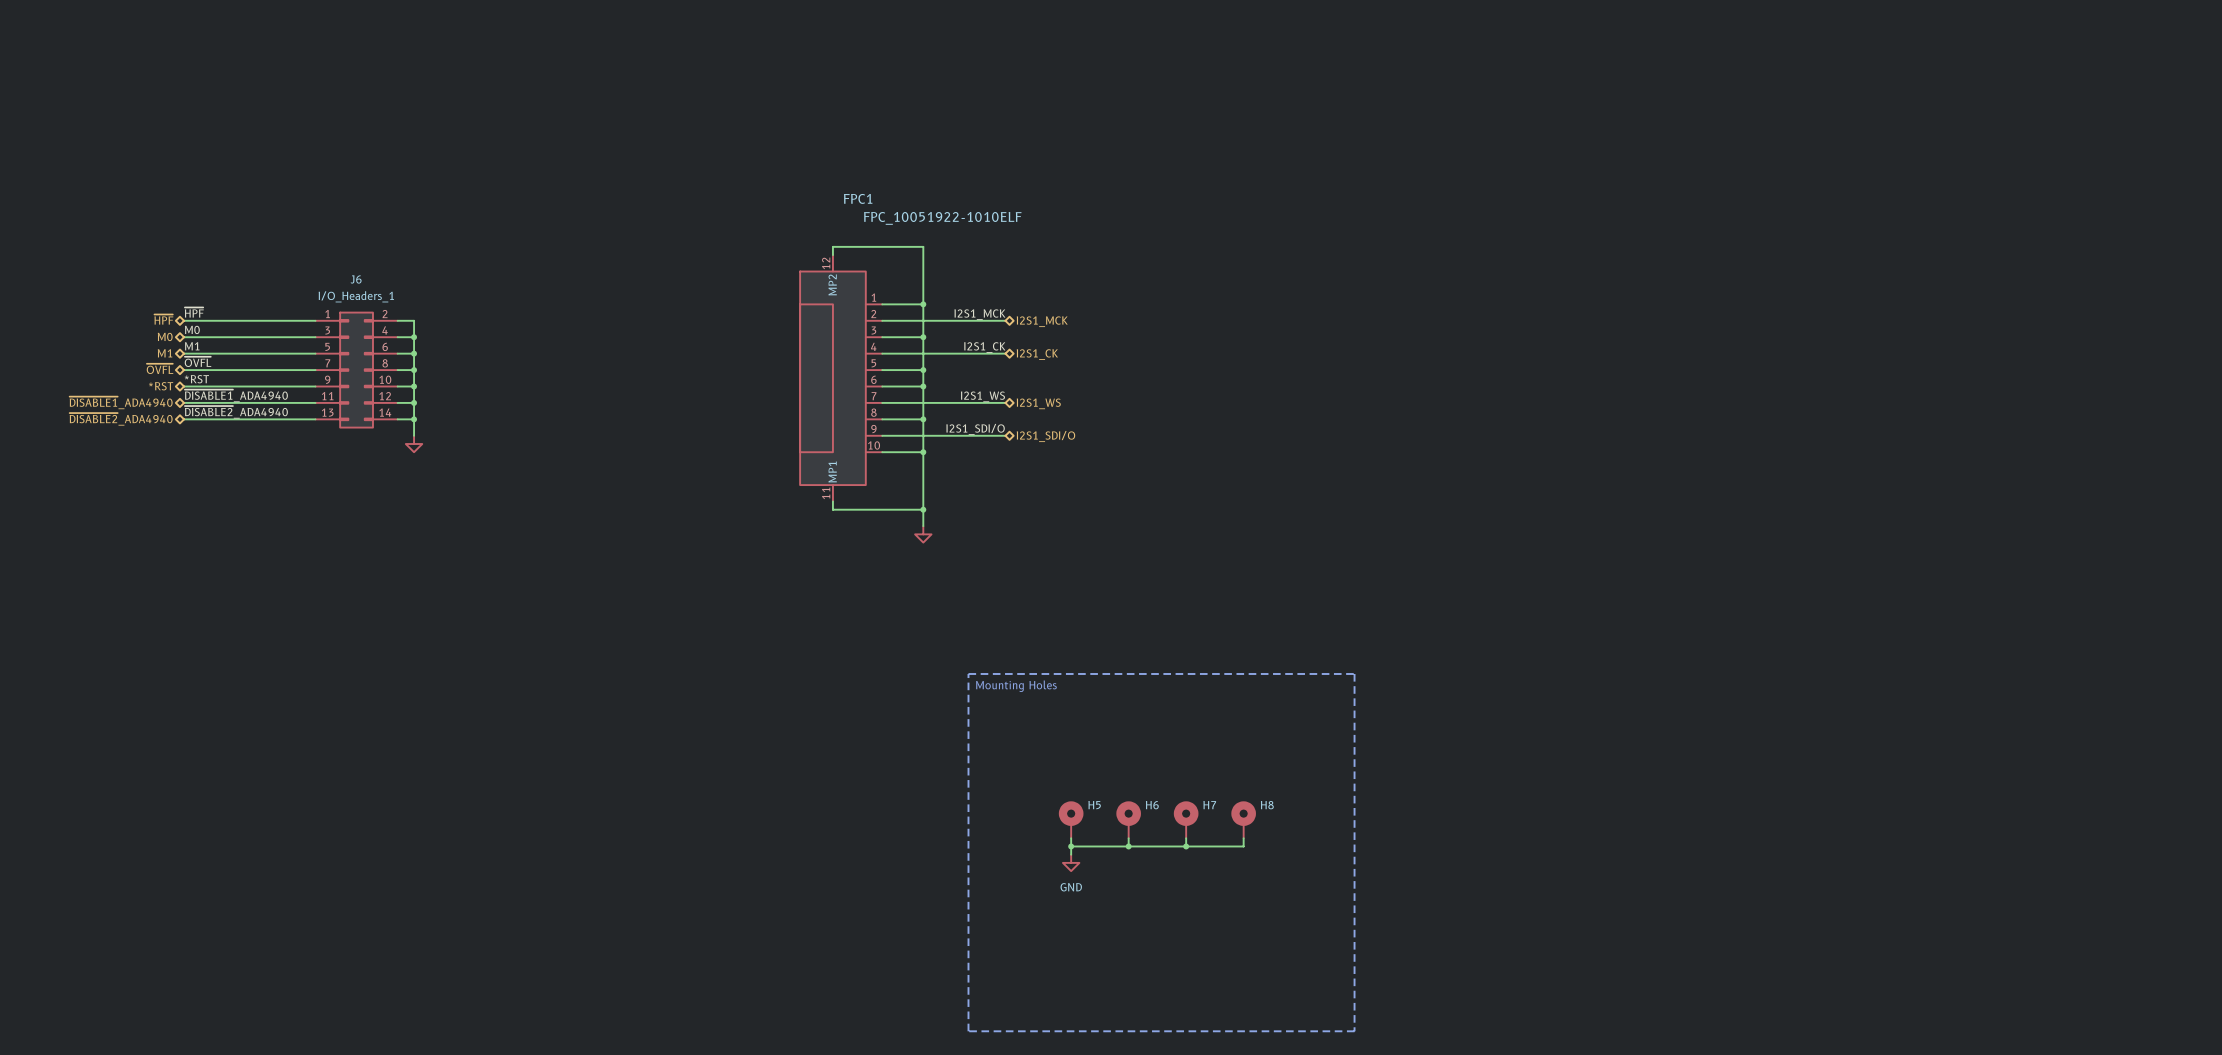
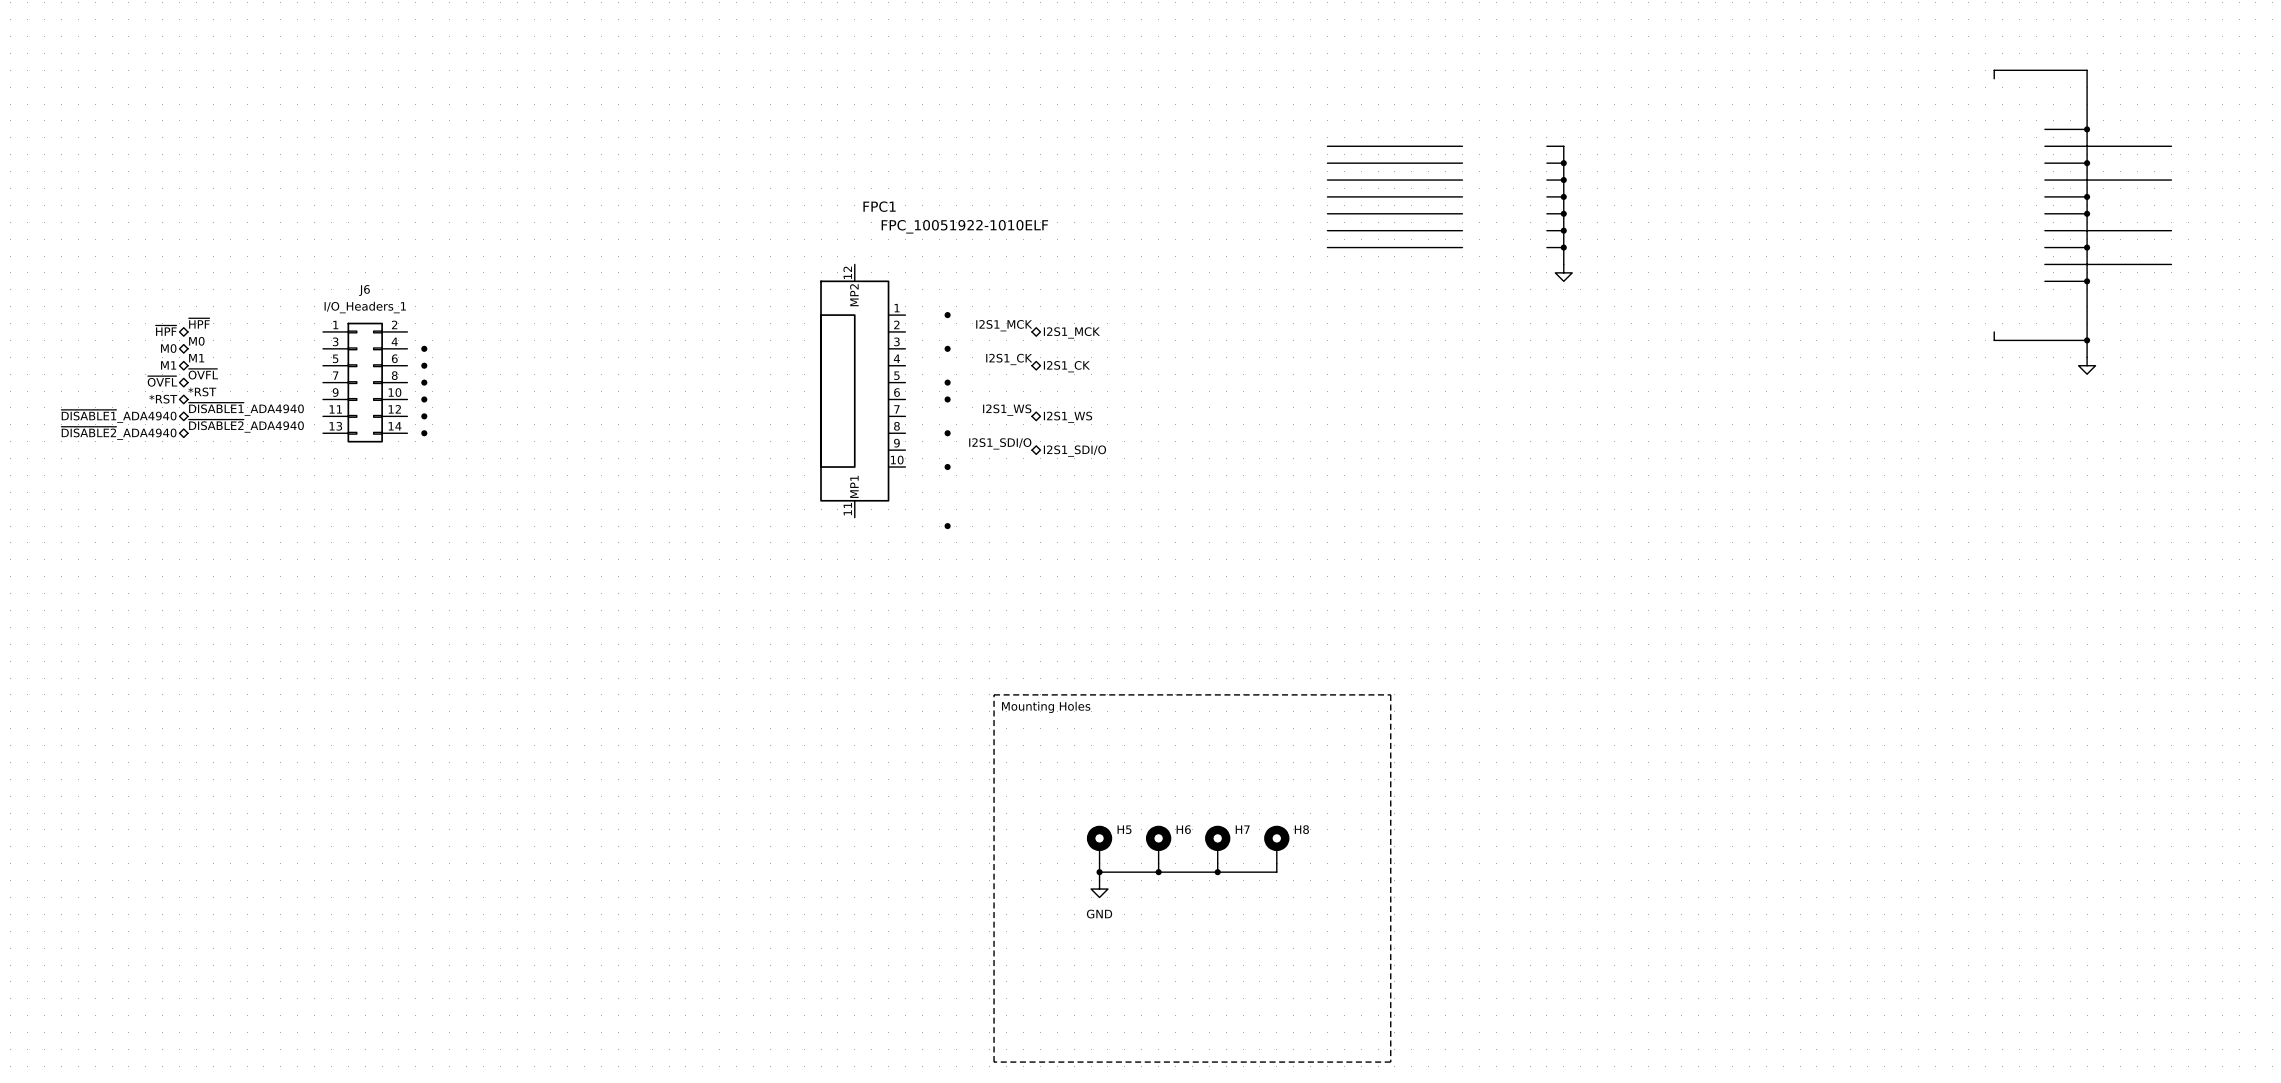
wire: none -> (1994, 78) (1994, 70) (2087, 70) (2087, 357)
wire: none -> (2044, 129) (2087, 129)
junction: none -> (2087, 129)
wire: none -> (1327, 146) (1462, 146)
wire: none -> (1546, 146) (1563, 146) (1563, 264)
wire: none -> (2044, 146) (2171, 146)
wire: none -> (1327, 163) (1462, 163)
wire: none -> (1546, 163) (1563, 163)
junction: none -> (1563, 163)
wire: none -> (2044, 163) (2087, 163)
junction: none -> (2087, 163)
wire: none -> (1327, 180) (1462, 180)
wire: none -> (1546, 180) (1563, 180)
junction: none -> (1563, 180)
wire: none -> (2044, 180) (2171, 180)
wire: none -> (1327, 196) (1462, 196)
wire: none -> (1546, 196) (1563, 196)
junction: none -> (1563, 196)
wire: none -> (2044, 196) (2087, 196)
junction: none -> (2087, 196)
wire: none -> (1327, 213) (1462, 213)
wire: none -> (1546, 213) (1563, 213)
junction: none -> (1563, 213)
wire: none -> (2044, 213) (2087, 213)
junction: none -> (2087, 213)
wire: none -> (1327, 230) (1462, 230)
wire: none -> (1546, 230) (1563, 230)
junction: none -> (1563, 230)
wire: none -> (2044, 230) (2171, 230)
wire: none -> (1327, 247) (1462, 247)
wire: none -> (1546, 247) (1563, 247)
junction: none -> (1563, 247)
wire: none -> (2044, 247) (2087, 247)
junction: none -> (2087, 247)
wire: (832, 255) (832, 246) (923, 246) (923, 526) -> none
wire: none -> (2044, 264) (2171, 264)
power symbol: none -> (1563, 272)
wire: none -> (2044, 281) (2087, 281)
junction: none -> (2087, 281)
wire: (882, 304) (923, 304) -> none
wire: (184, 320) (315, 320) -> none
wire: (397, 320) (414, 320) (414, 435) -> none
wire: (882, 320) (1005, 320) -> none
wire: none -> (1994, 331) (1994, 340) (2087, 340)
junction: none -> (2087, 340)
wire: (184, 337) (315, 337) -> none
wire: (397, 337) (414, 337) -> none
wire: (882, 337) (923, 337) -> none
wire: (184, 353) (315, 353) -> none
wire: (397, 353) (414, 353) -> none
wire: (882, 353) (1005, 353) -> none
power symbol: none -> (2087, 365)
wire: (184, 370) (315, 370) -> none
wire: (397, 370) (414, 370) -> none
wire: (882, 370) (923, 370) -> none
wire: (184, 386) (315, 386) -> none
wire: (397, 386) (414, 386) -> none
wire: (882, 386) (923, 386) -> none
wire: (184, 402) (315, 402) -> none
wire: (397, 402) (414, 402) -> none
wire: (882, 402) (1005, 402) -> none
wire: (184, 419) (315, 419) -> none
wire: (397, 419) (414, 419) -> none
wire: (882, 419) (923, 419) -> none
wire: (882, 435) (1005, 435) -> none
power symbol: (414, 444) -> none
wire: (882, 452) (923, 452) -> none
wire: (832, 501) (832, 509) (923, 509) -> none
power symbol: (923, 534) -> none

